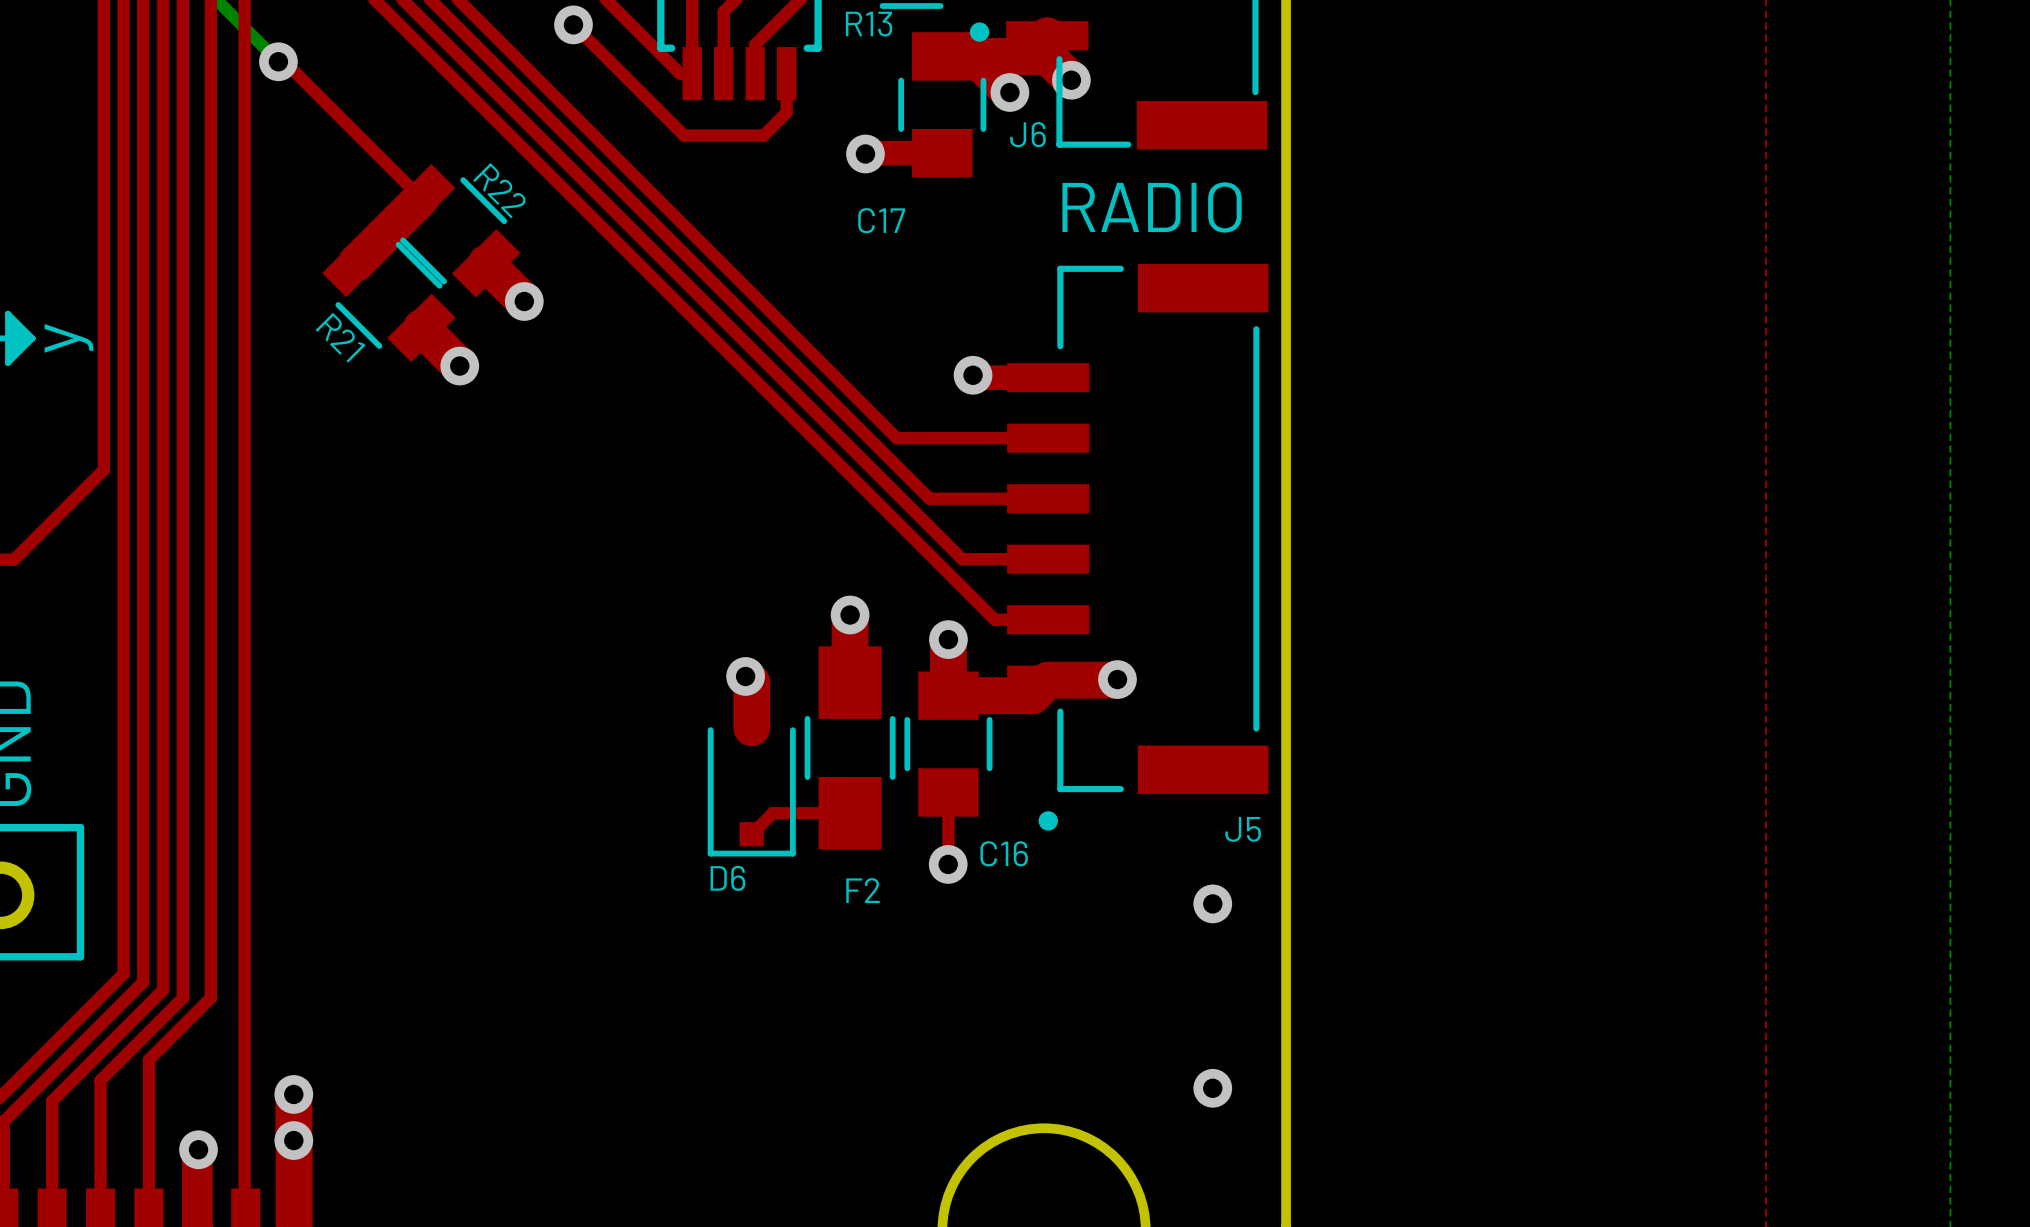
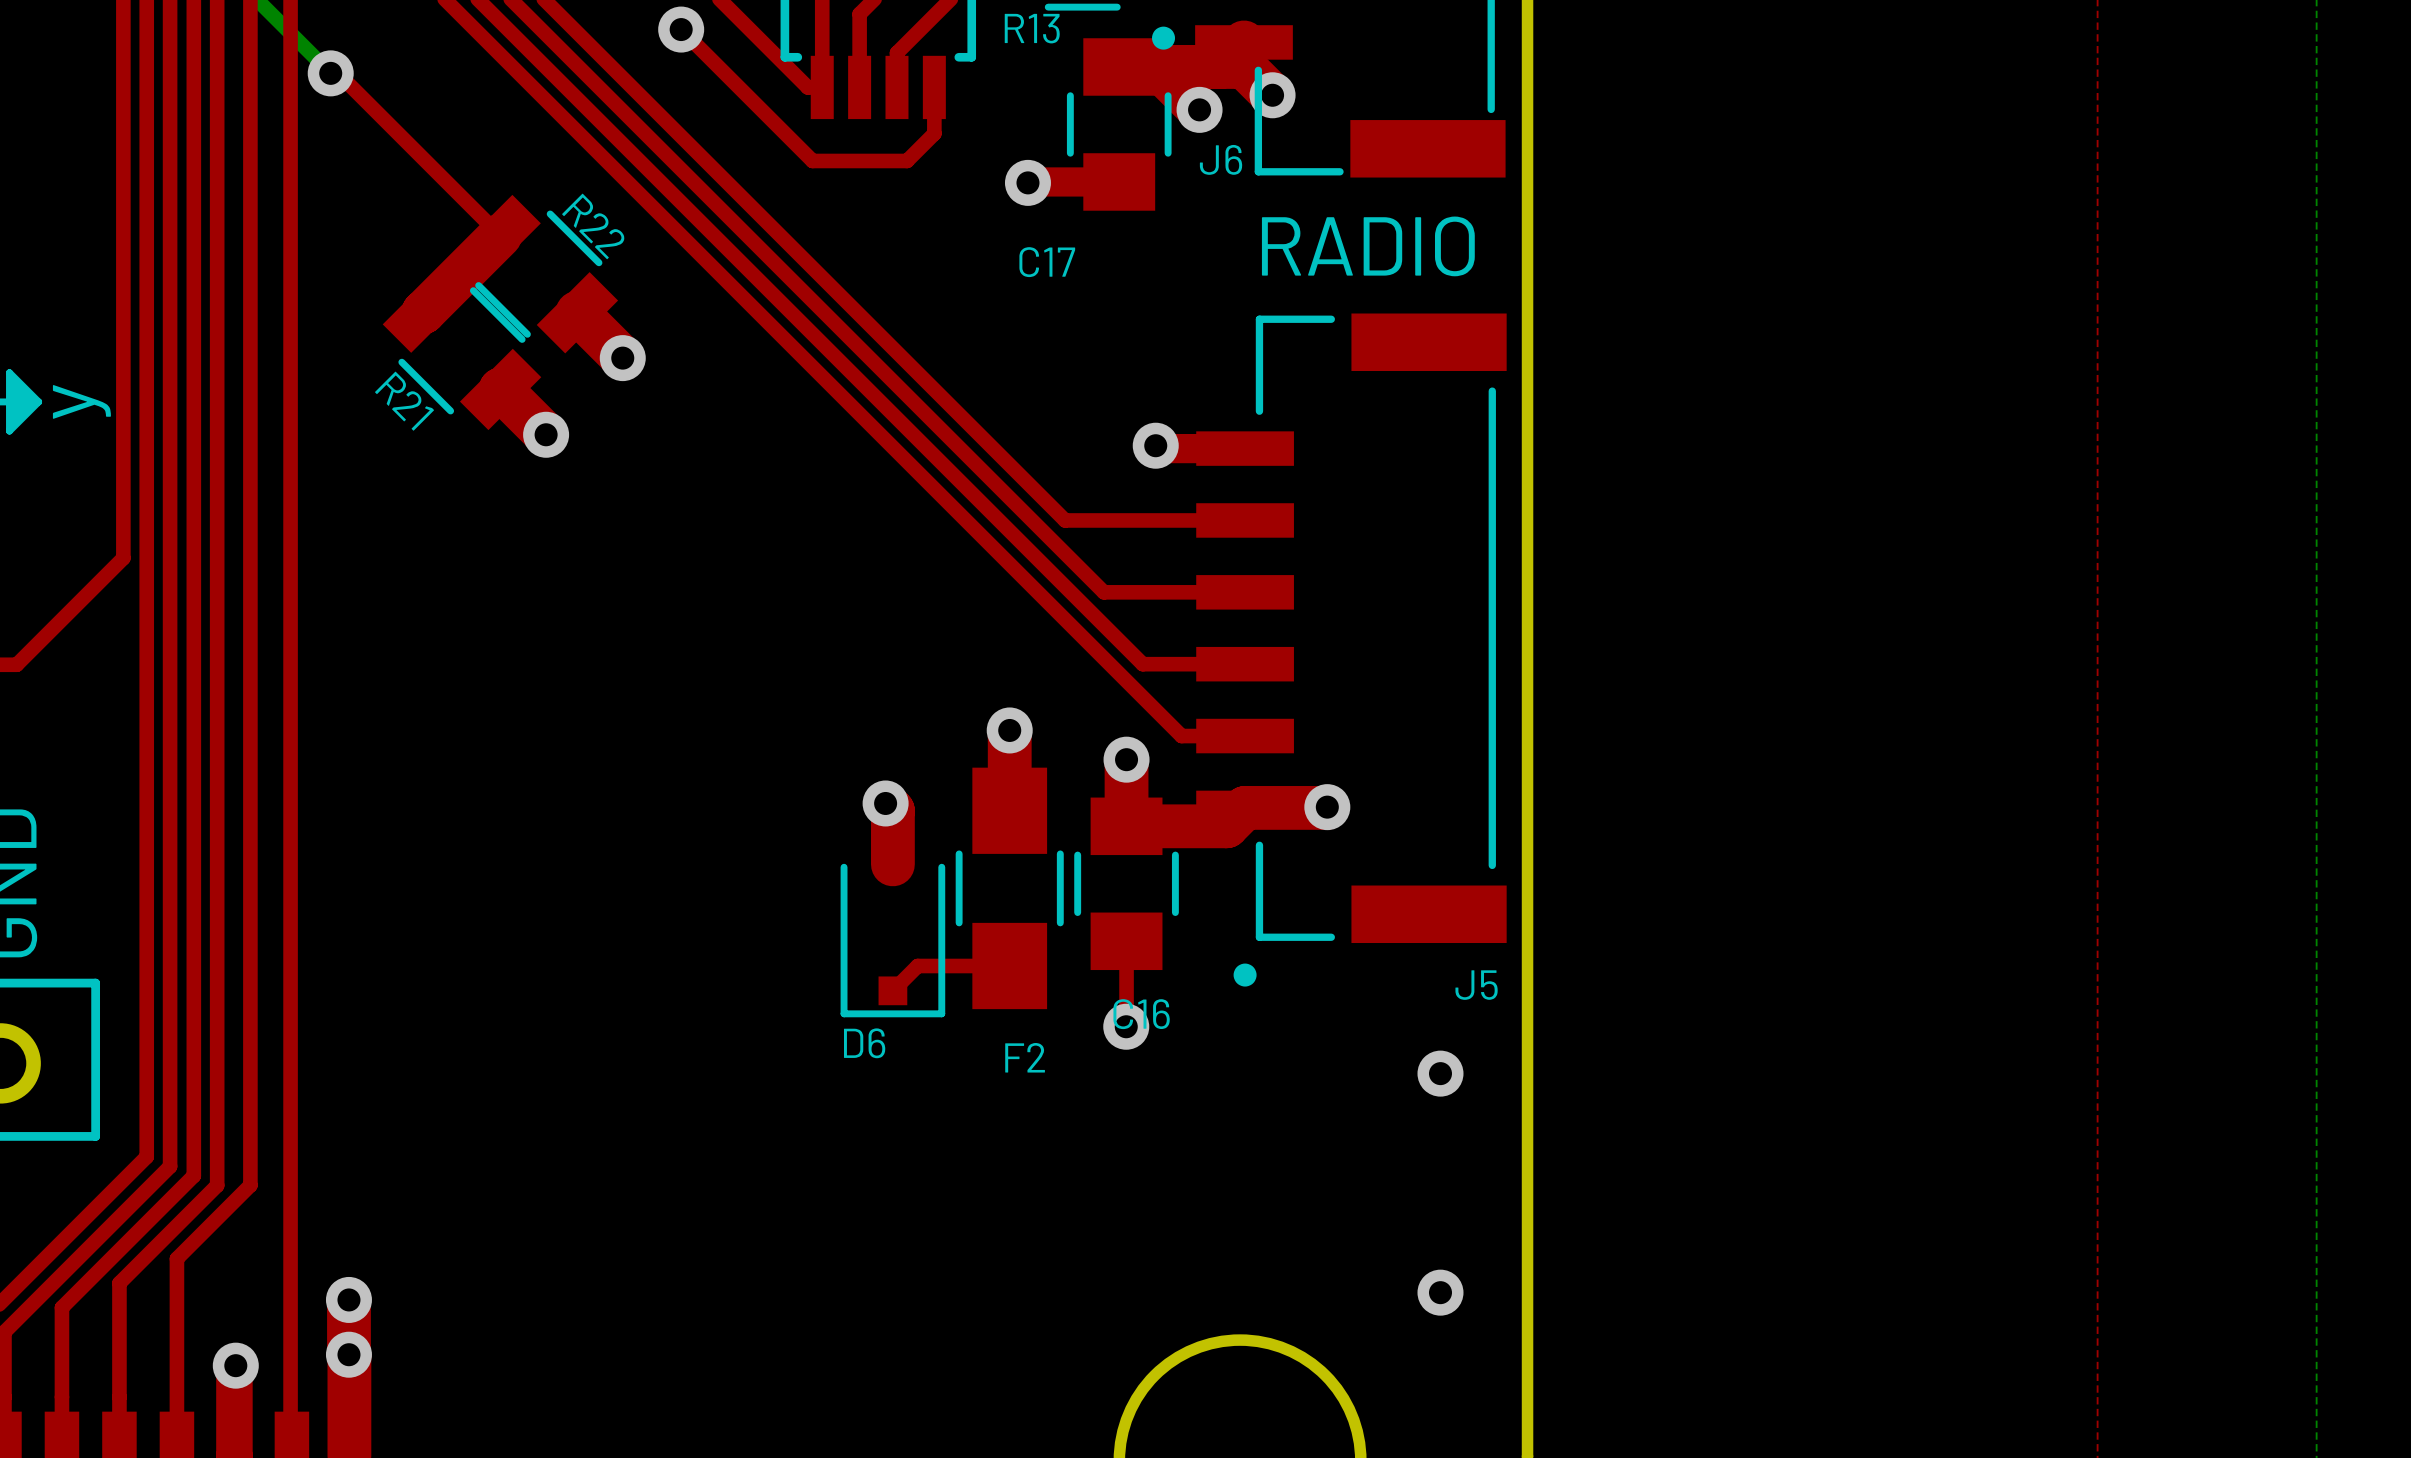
C16 name position: C16 (1004, 853) -> C16 (1141, 1014)

